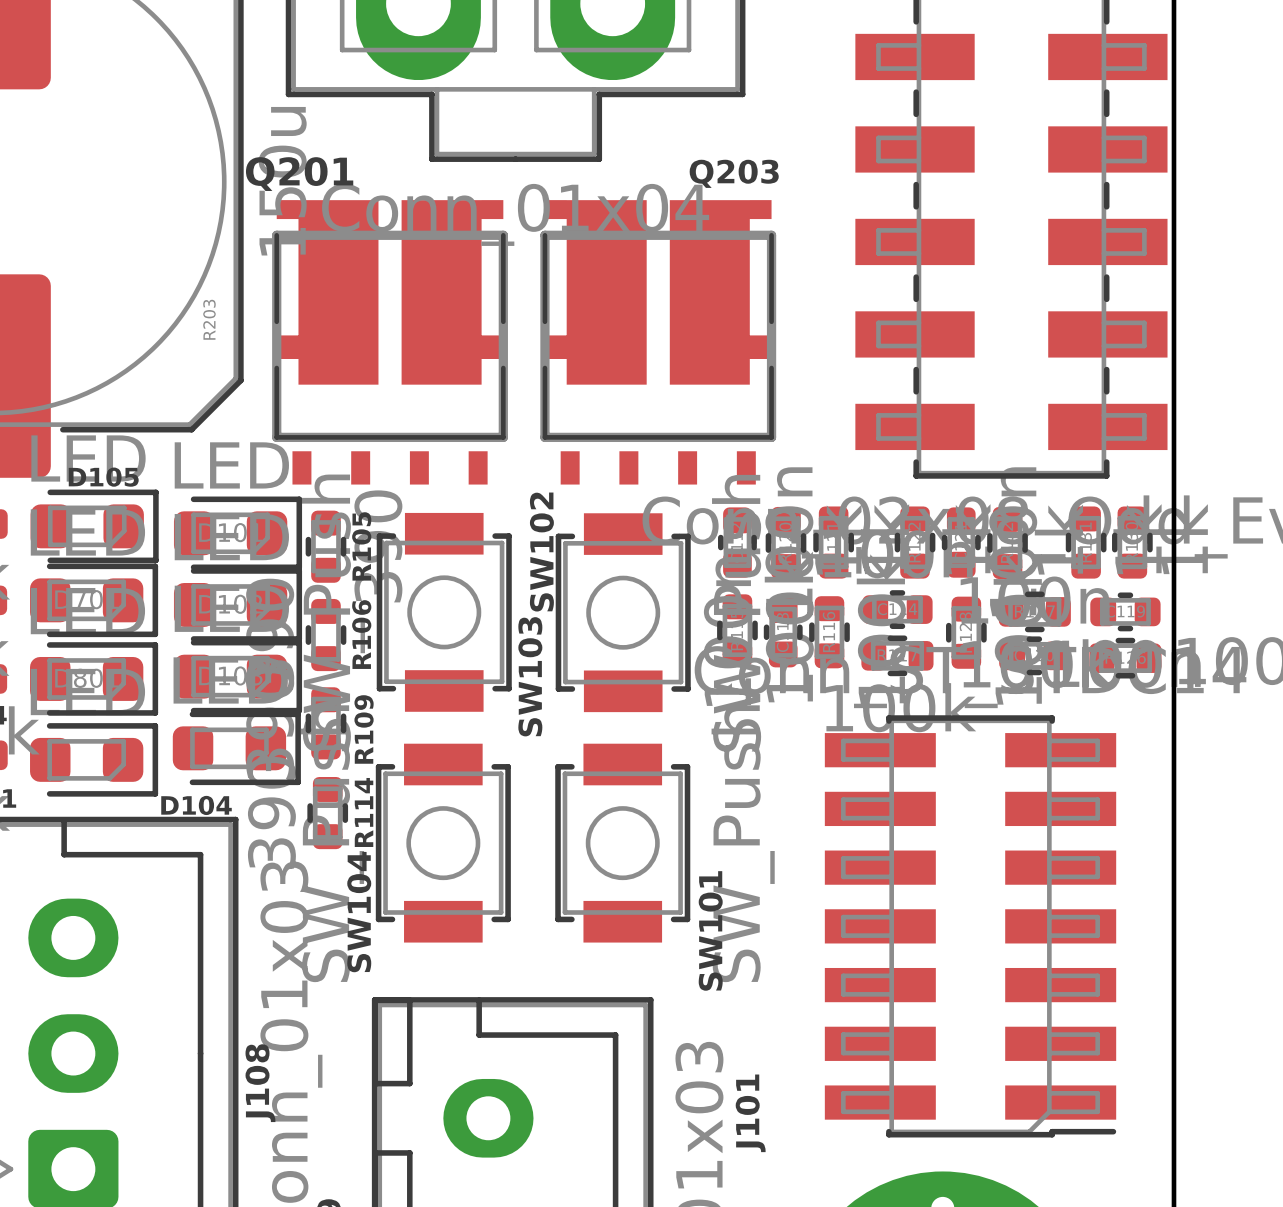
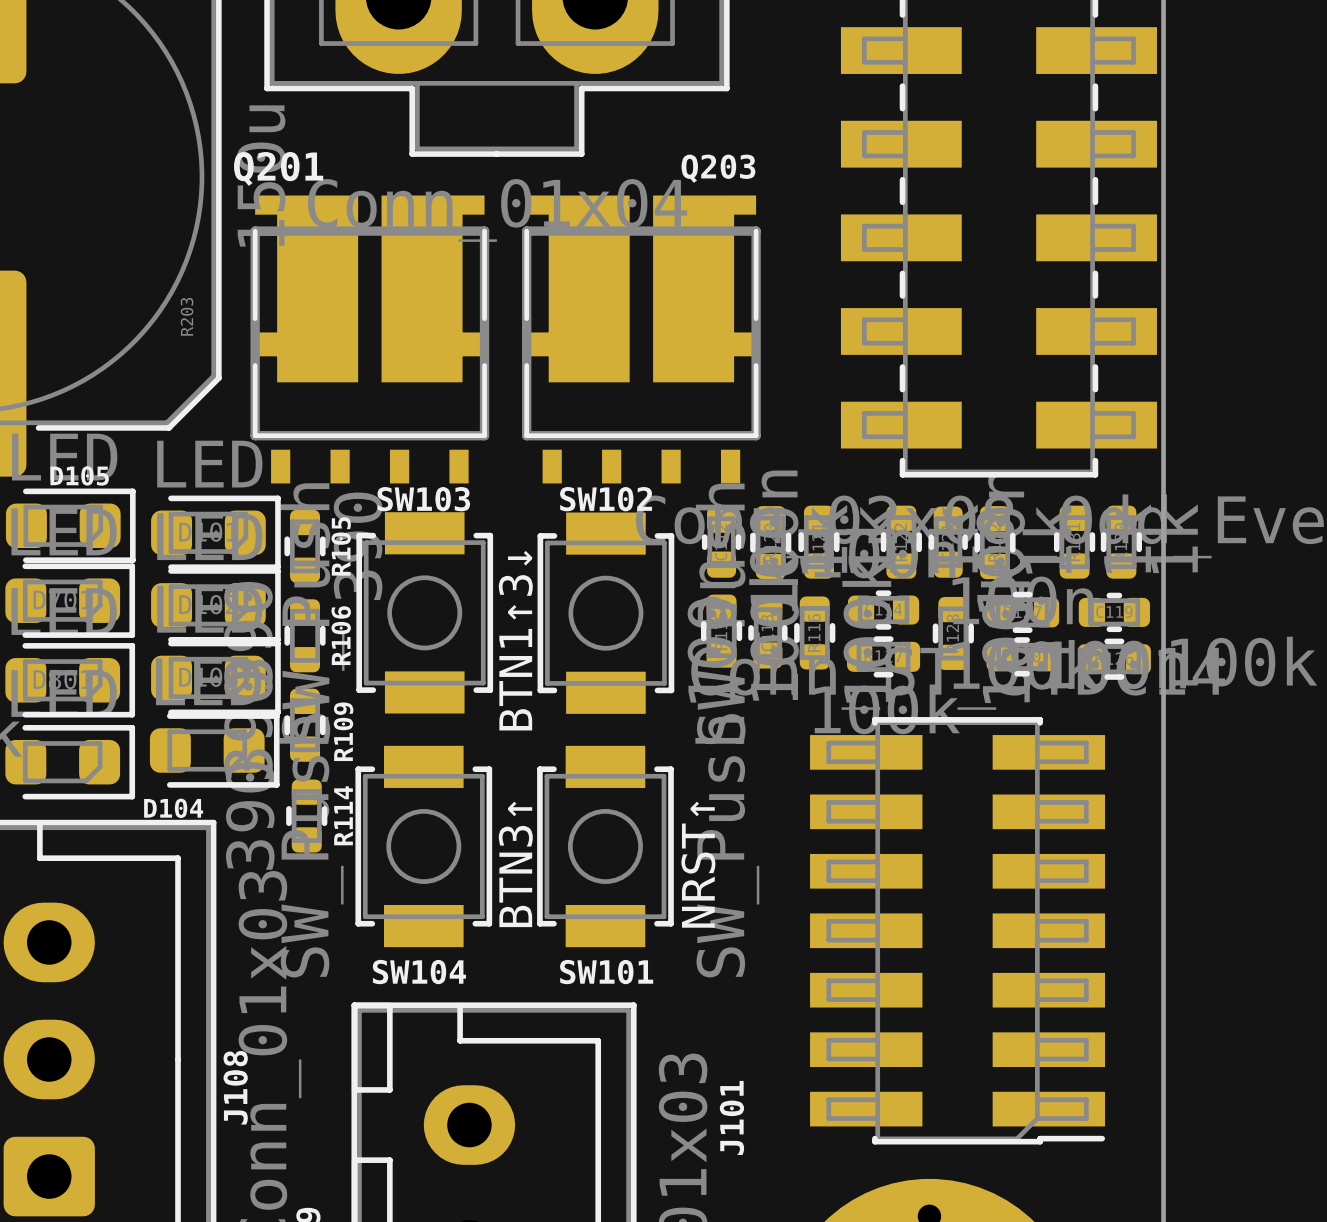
SW102 name rotation: 0° (541, 552) -> 90° clockwise (606, 499)
text: none -> BTN1↑3↓ (515, 640)
SW103 name rotation: 0° (530, 676) -> 90° clockwise (423, 499)
SW103 name position: SW103 (530, 676) -> SW103 (423, 499)
text: none -> BTN3↑ (515, 864)
text: none -> NRST↑ (698, 864)
SW104 name rotation: 0° (359, 912) -> 90° clockwise (419, 972)
SW101 name rotation: 0° (710, 930) -> 90° clockwise (606, 972)

